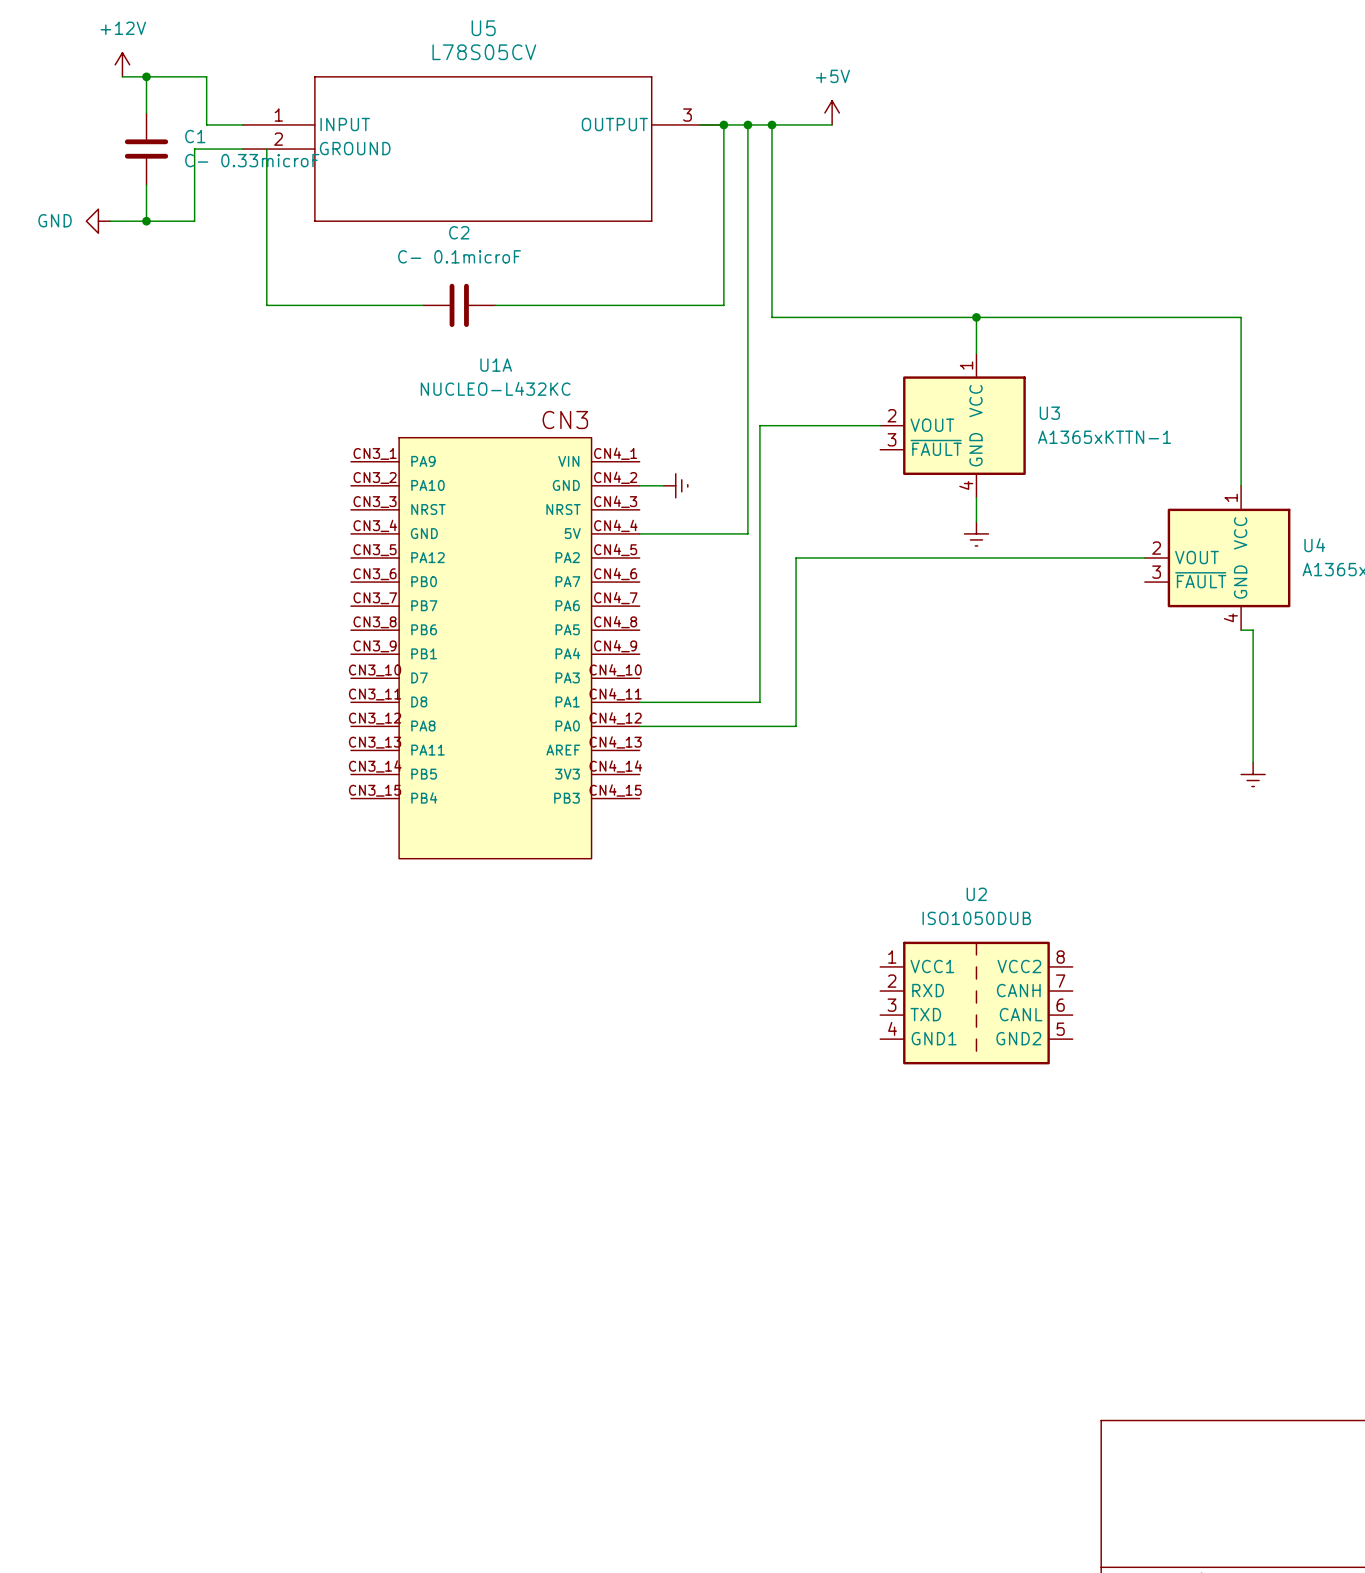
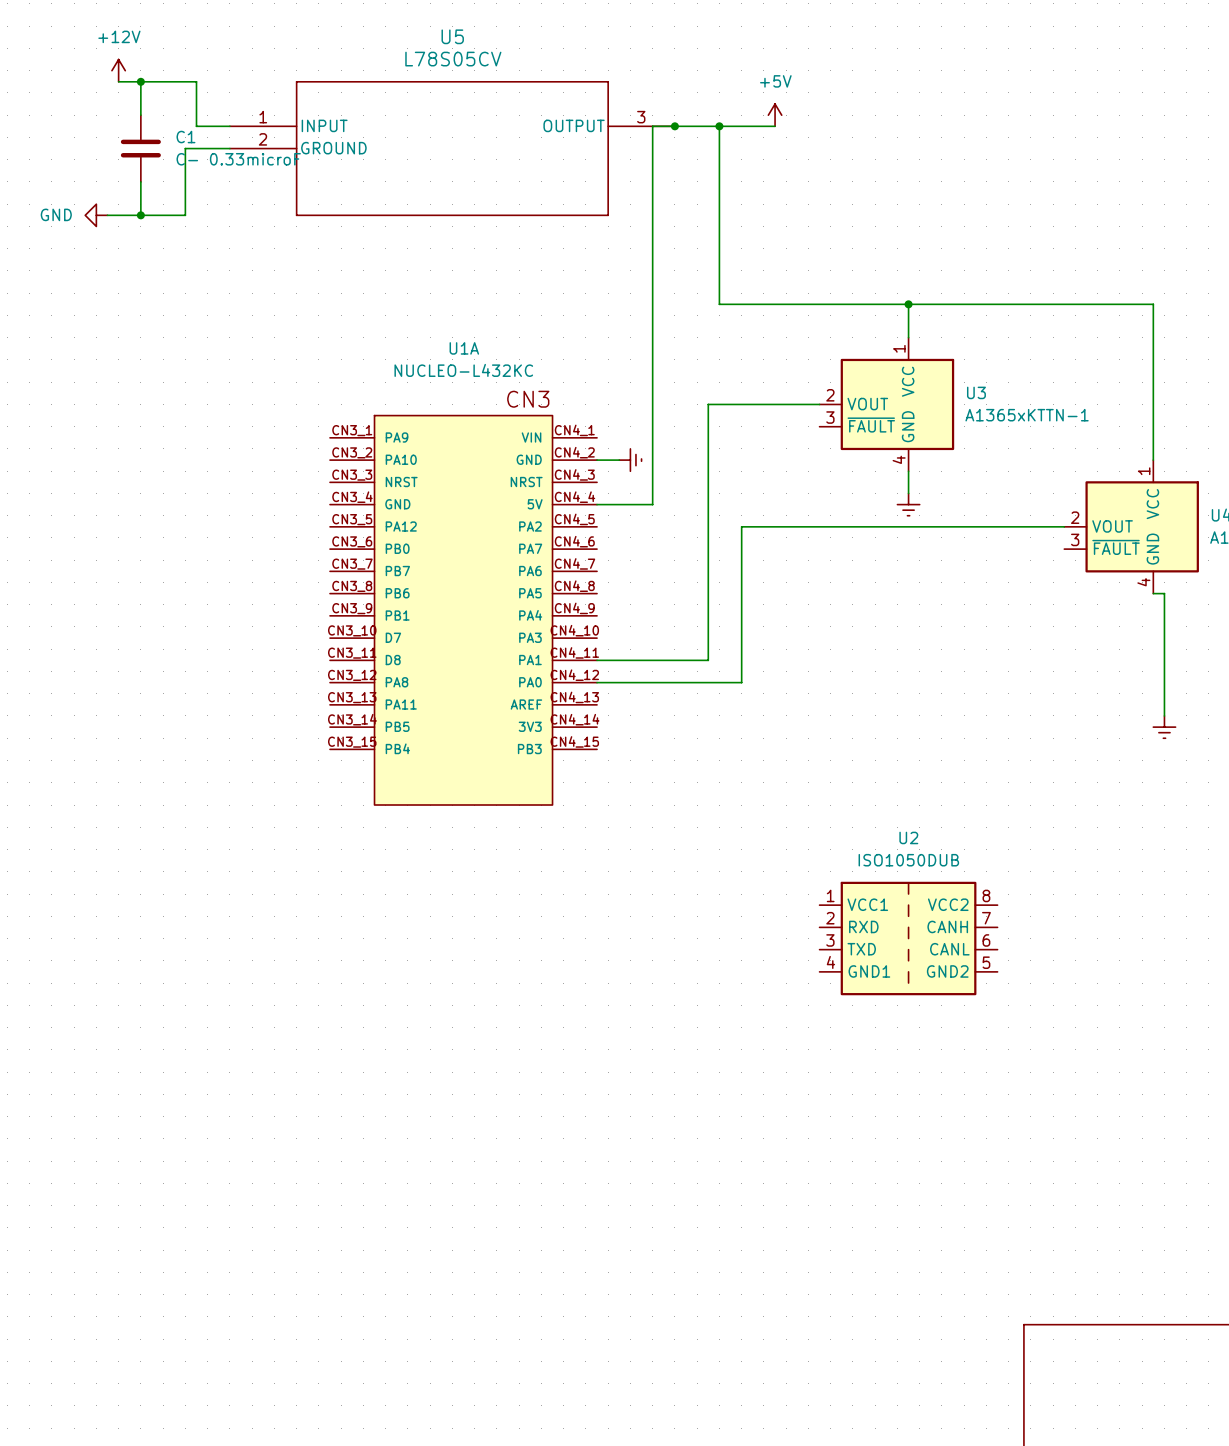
wire: (723, 124) (723, 305) (495, 305) -> none
wire: (747, 124) (747, 533) (699, 533) -> (652, 126) (652, 504)
junction: (747, 124) -> none
wire: (266, 149) (266, 305) (423, 305) -> none
C2: C- 0.1microF (459, 305) -> none

